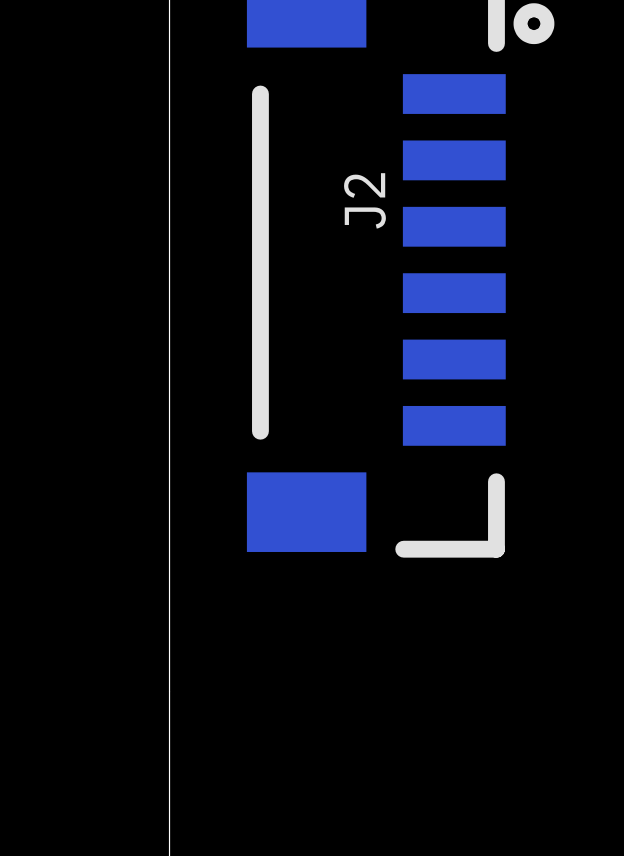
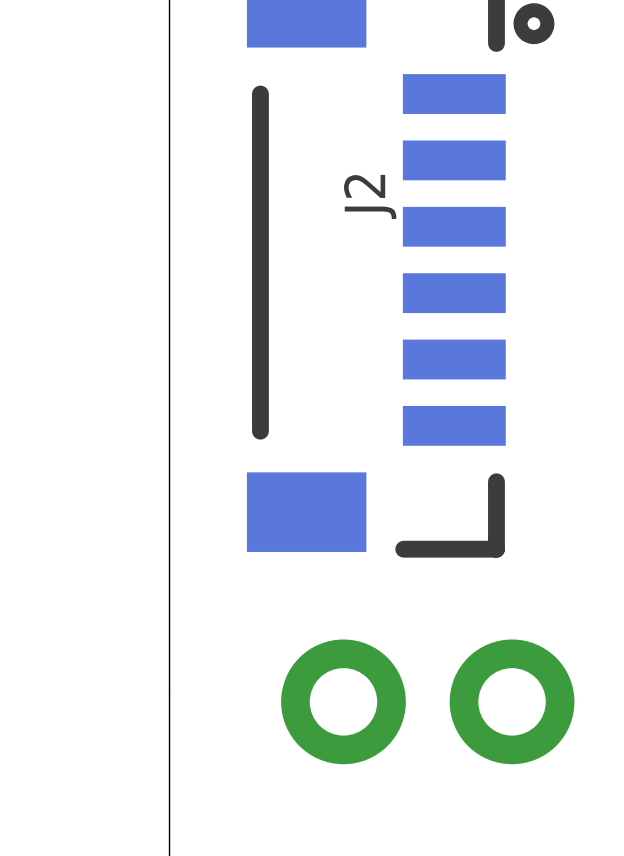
part: none -> (427, 701)

